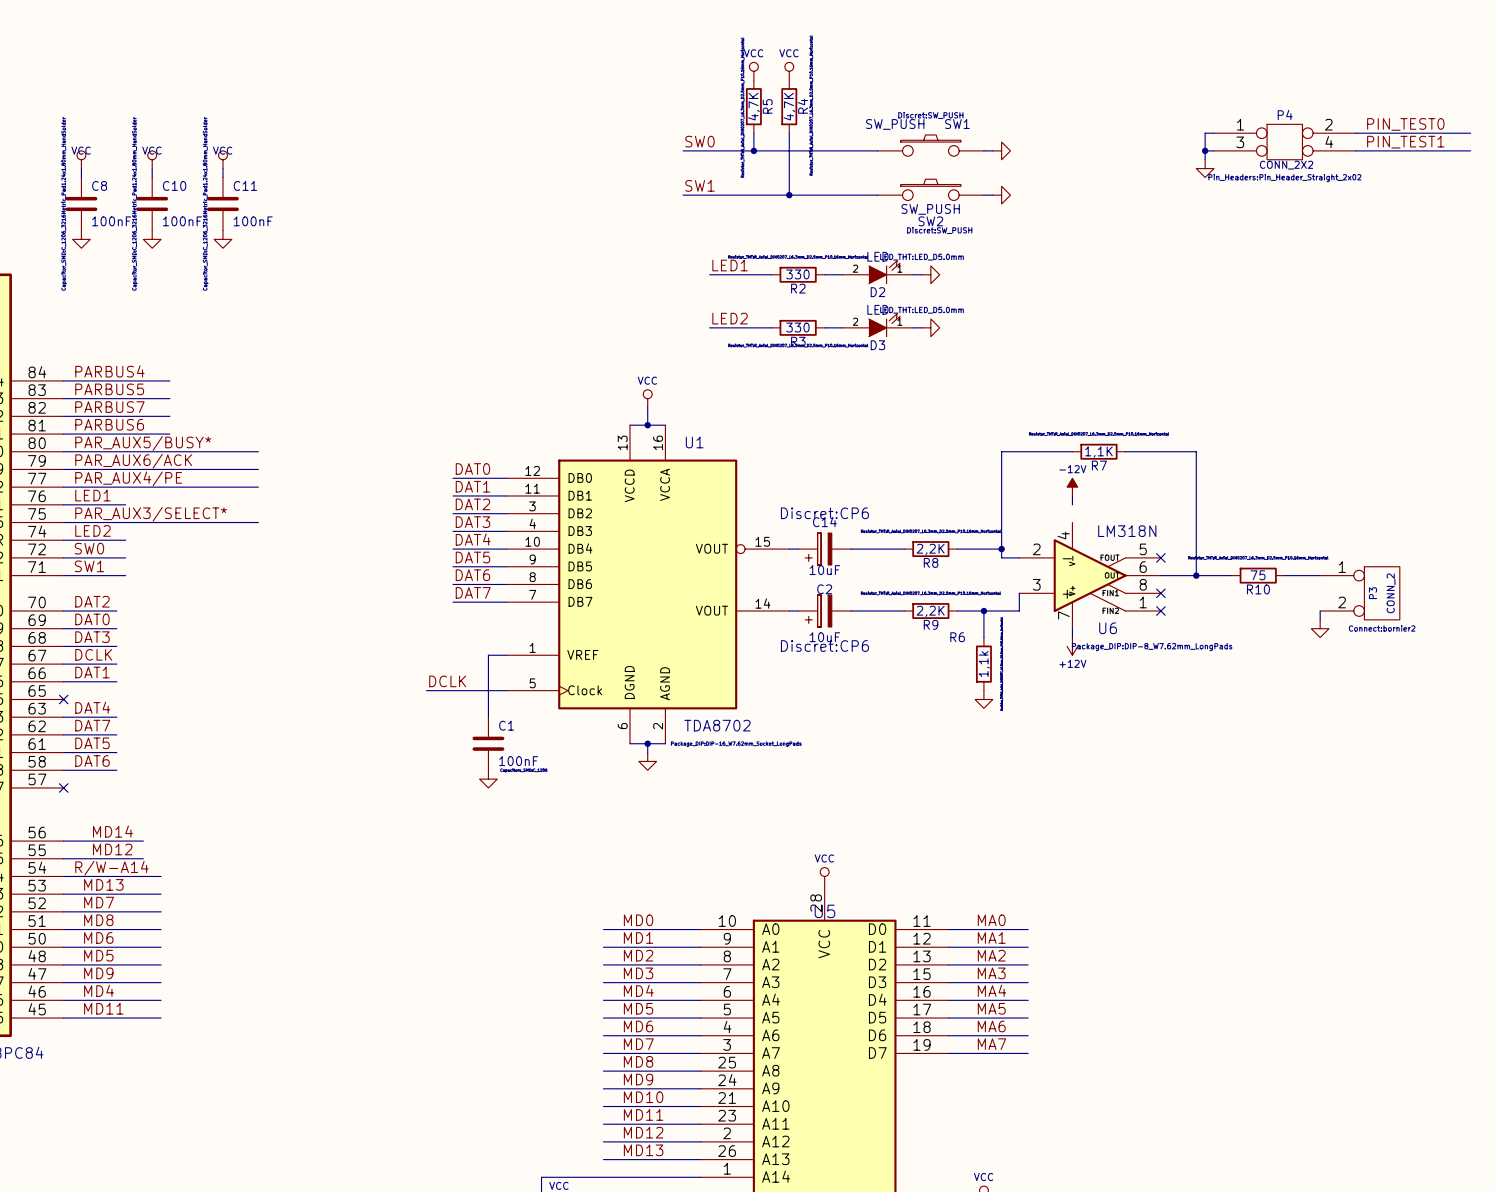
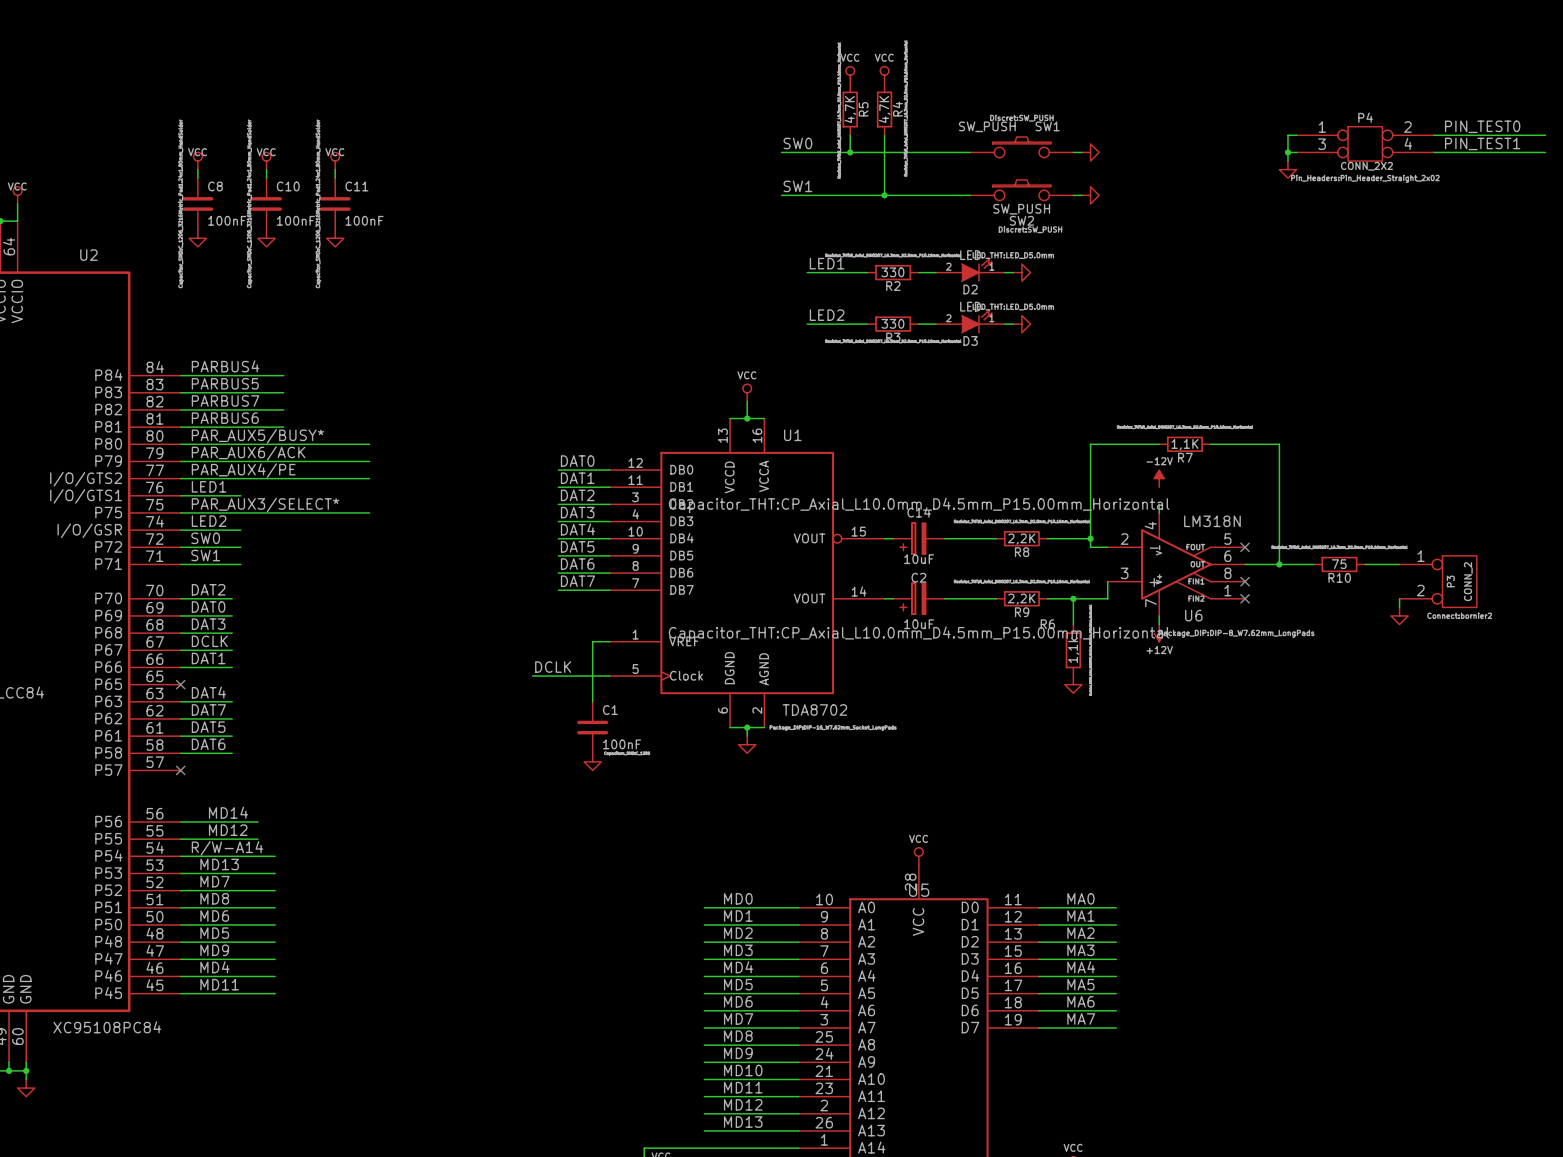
wire: (1072, 495) (1072, 504) -> (1159, 504) (1159, 512)
C14 text: Discret:CP6 (824, 513) -> Capacitor_THT:CP_Axial_L10.0mm_D4.5mm_P15.00mm_Horizontal (919, 505)
C2 text: Discret:CP6 (824, 646) -> Capacitor_THT:CP_Axial_L10.0mm_D4.5mm_P15.00mm_Horizontal (919, 634)

